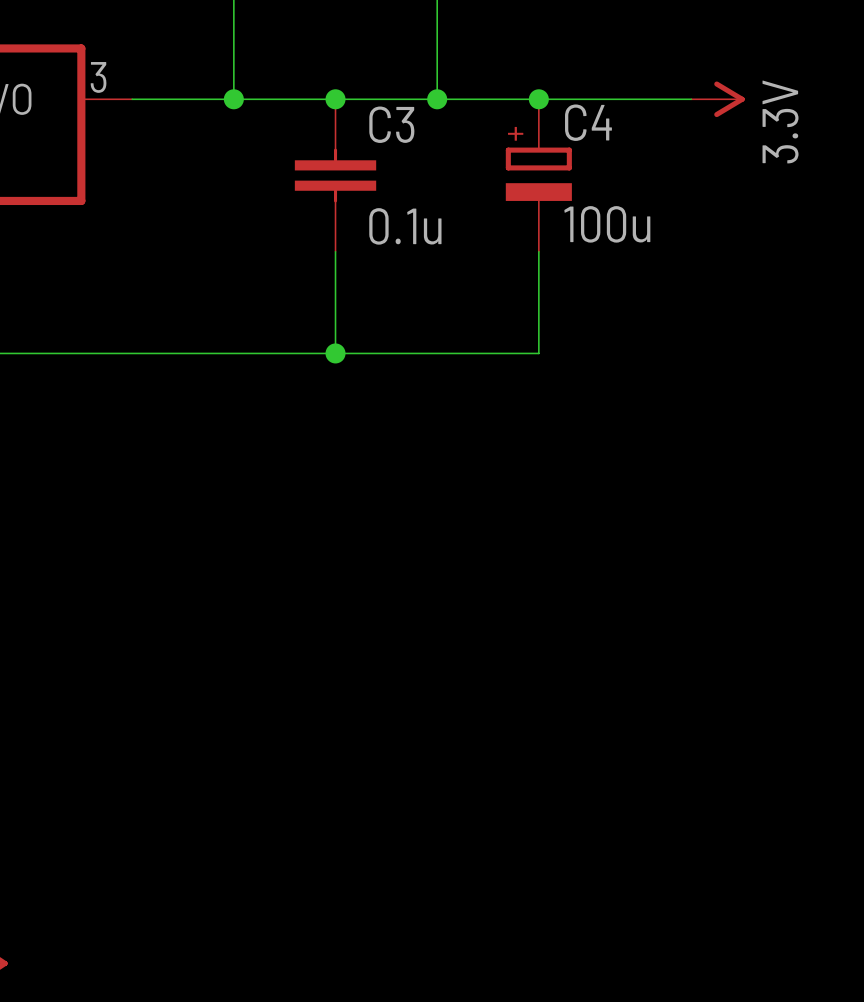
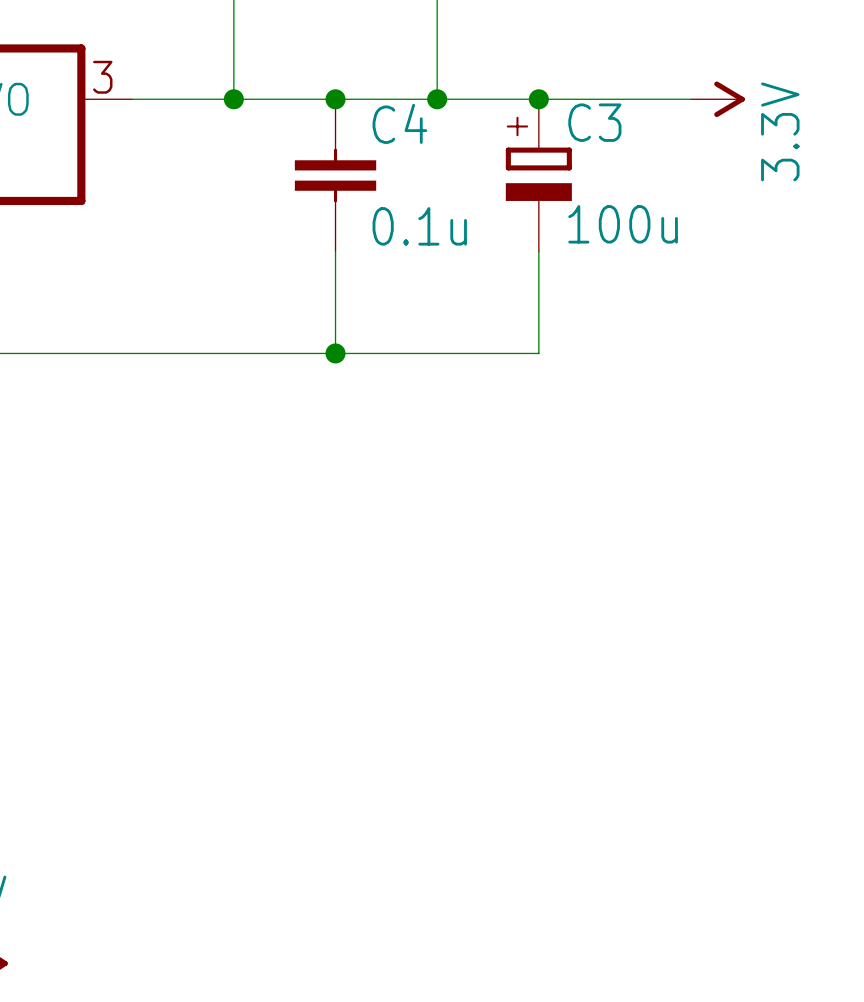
C4 name: C4 (588, 122) -> C3 (594, 122)
C3 name: C3 (391, 124) -> C4 (399, 123)

